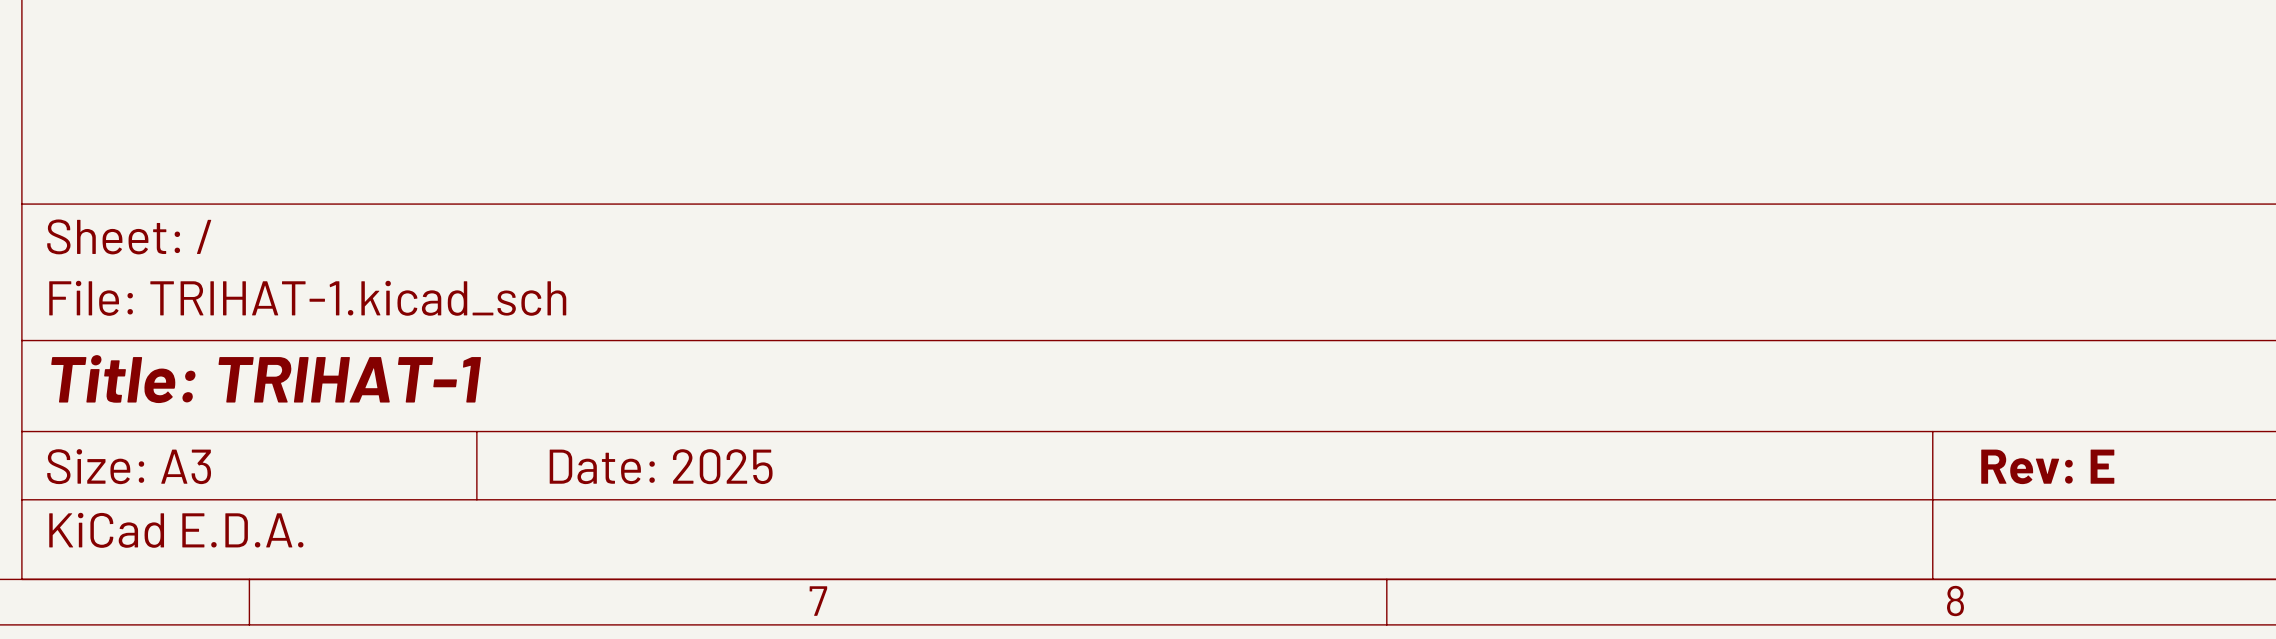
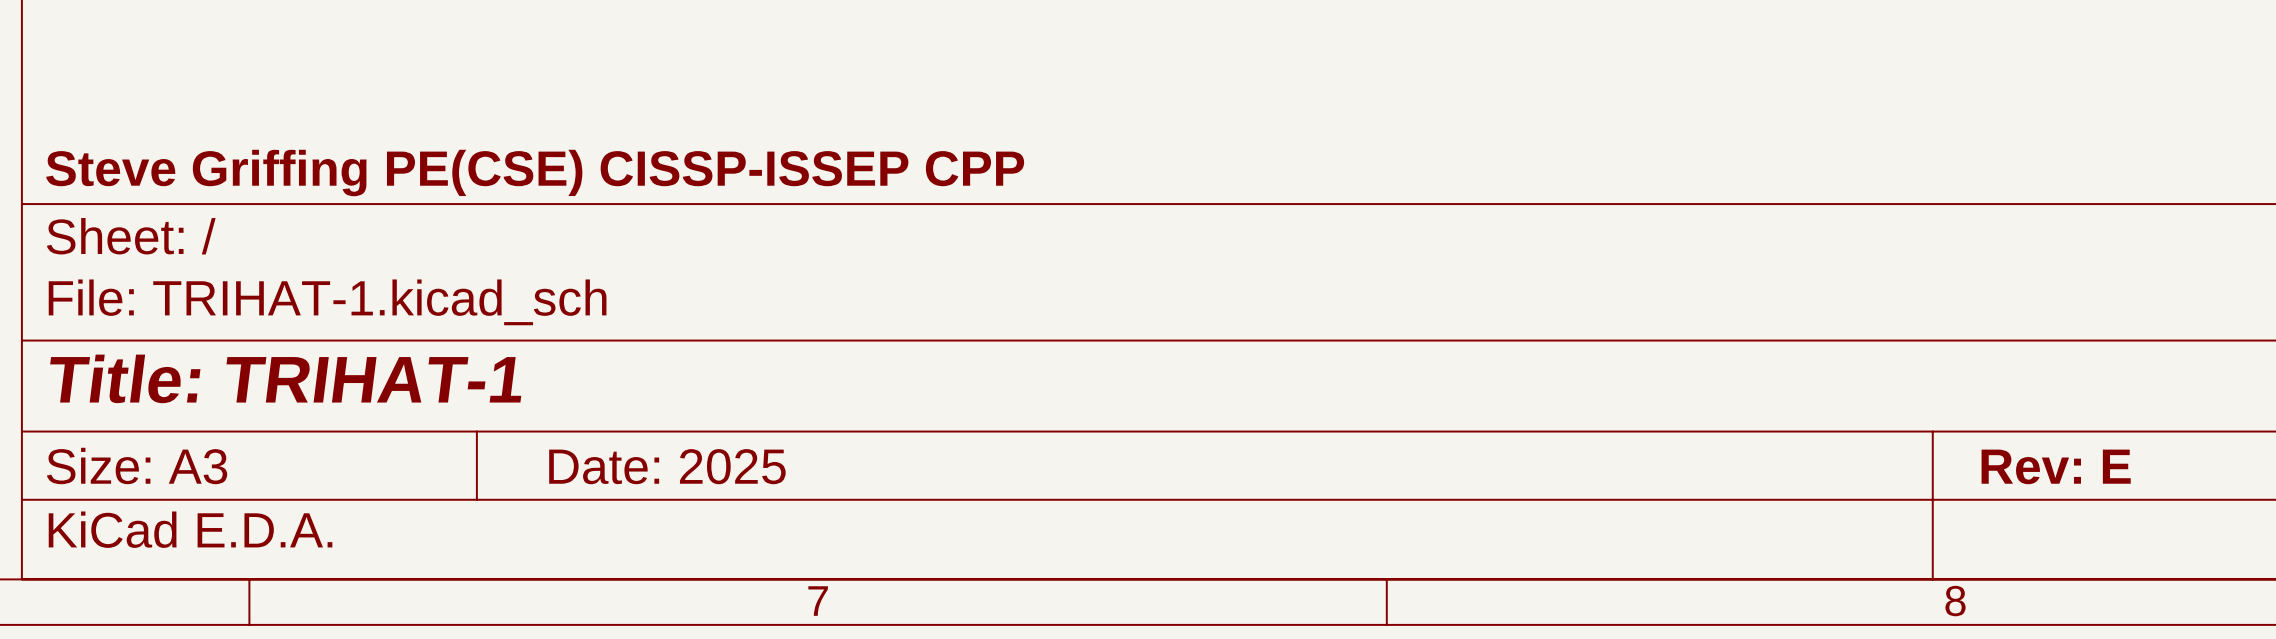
title block: none -> Steve Griffing PE(CSE) CISSP-ISSEP CPP (535, 173)

